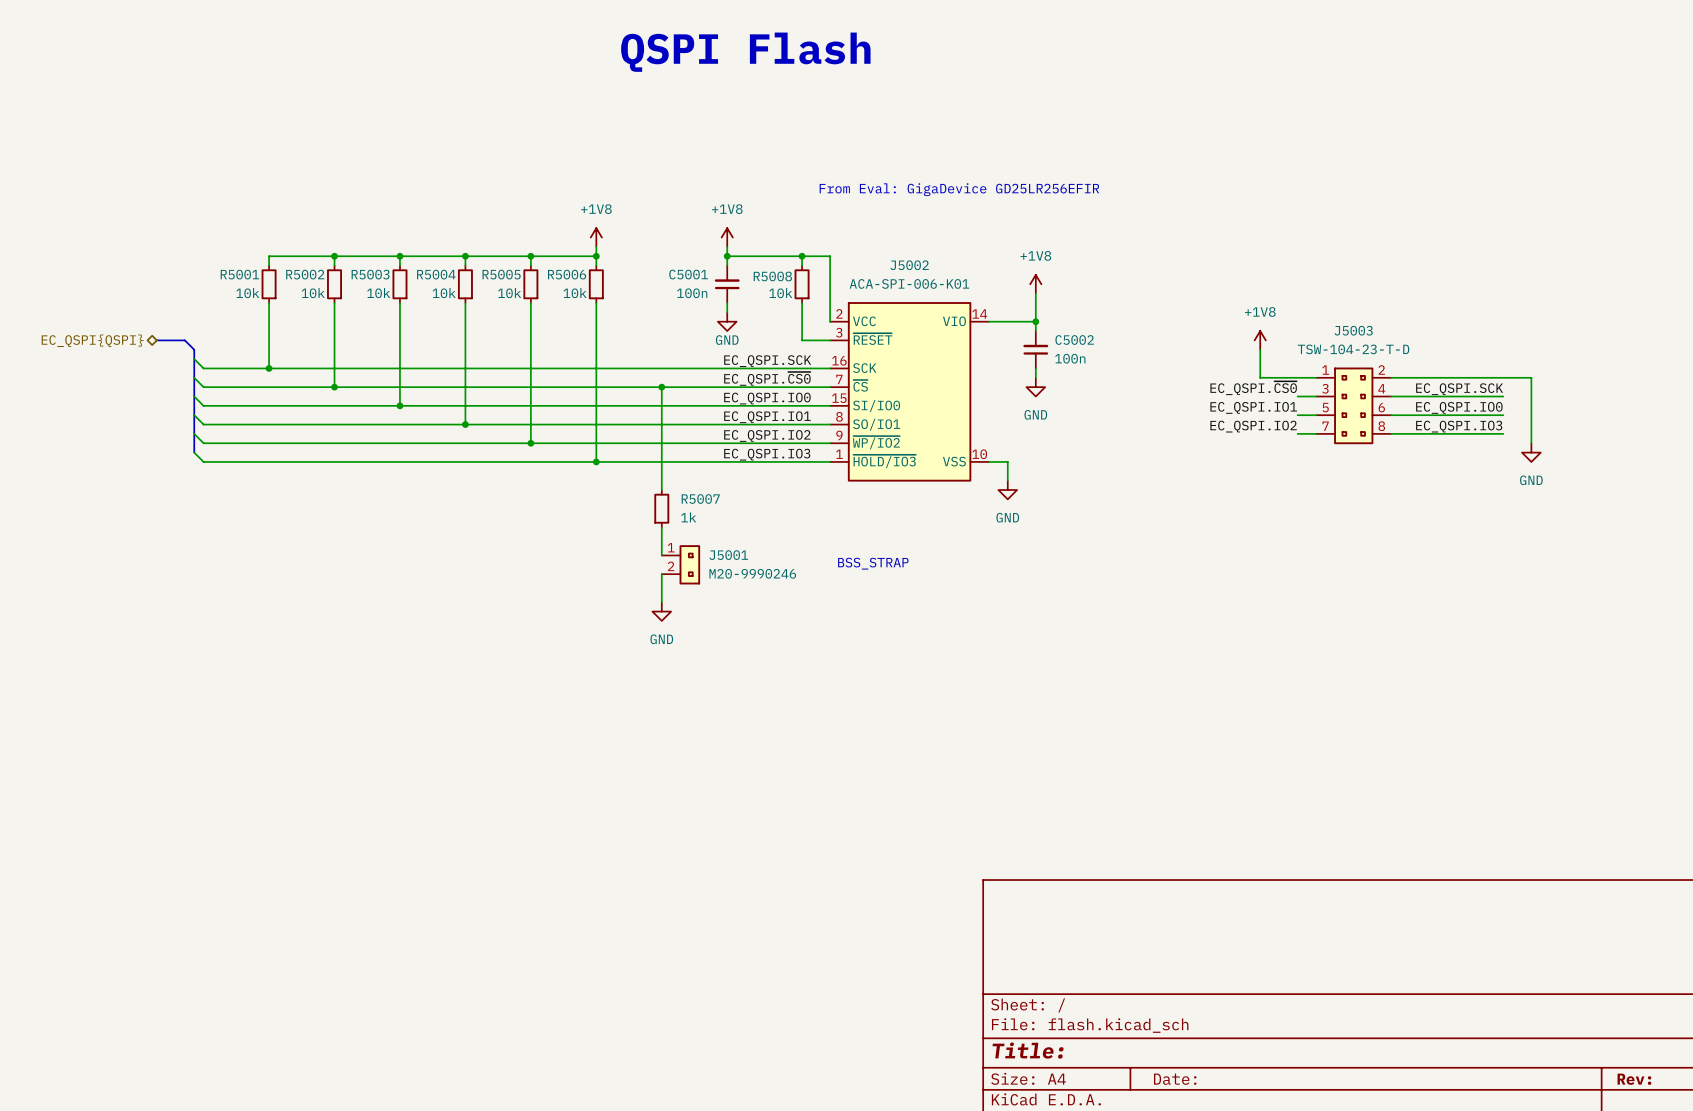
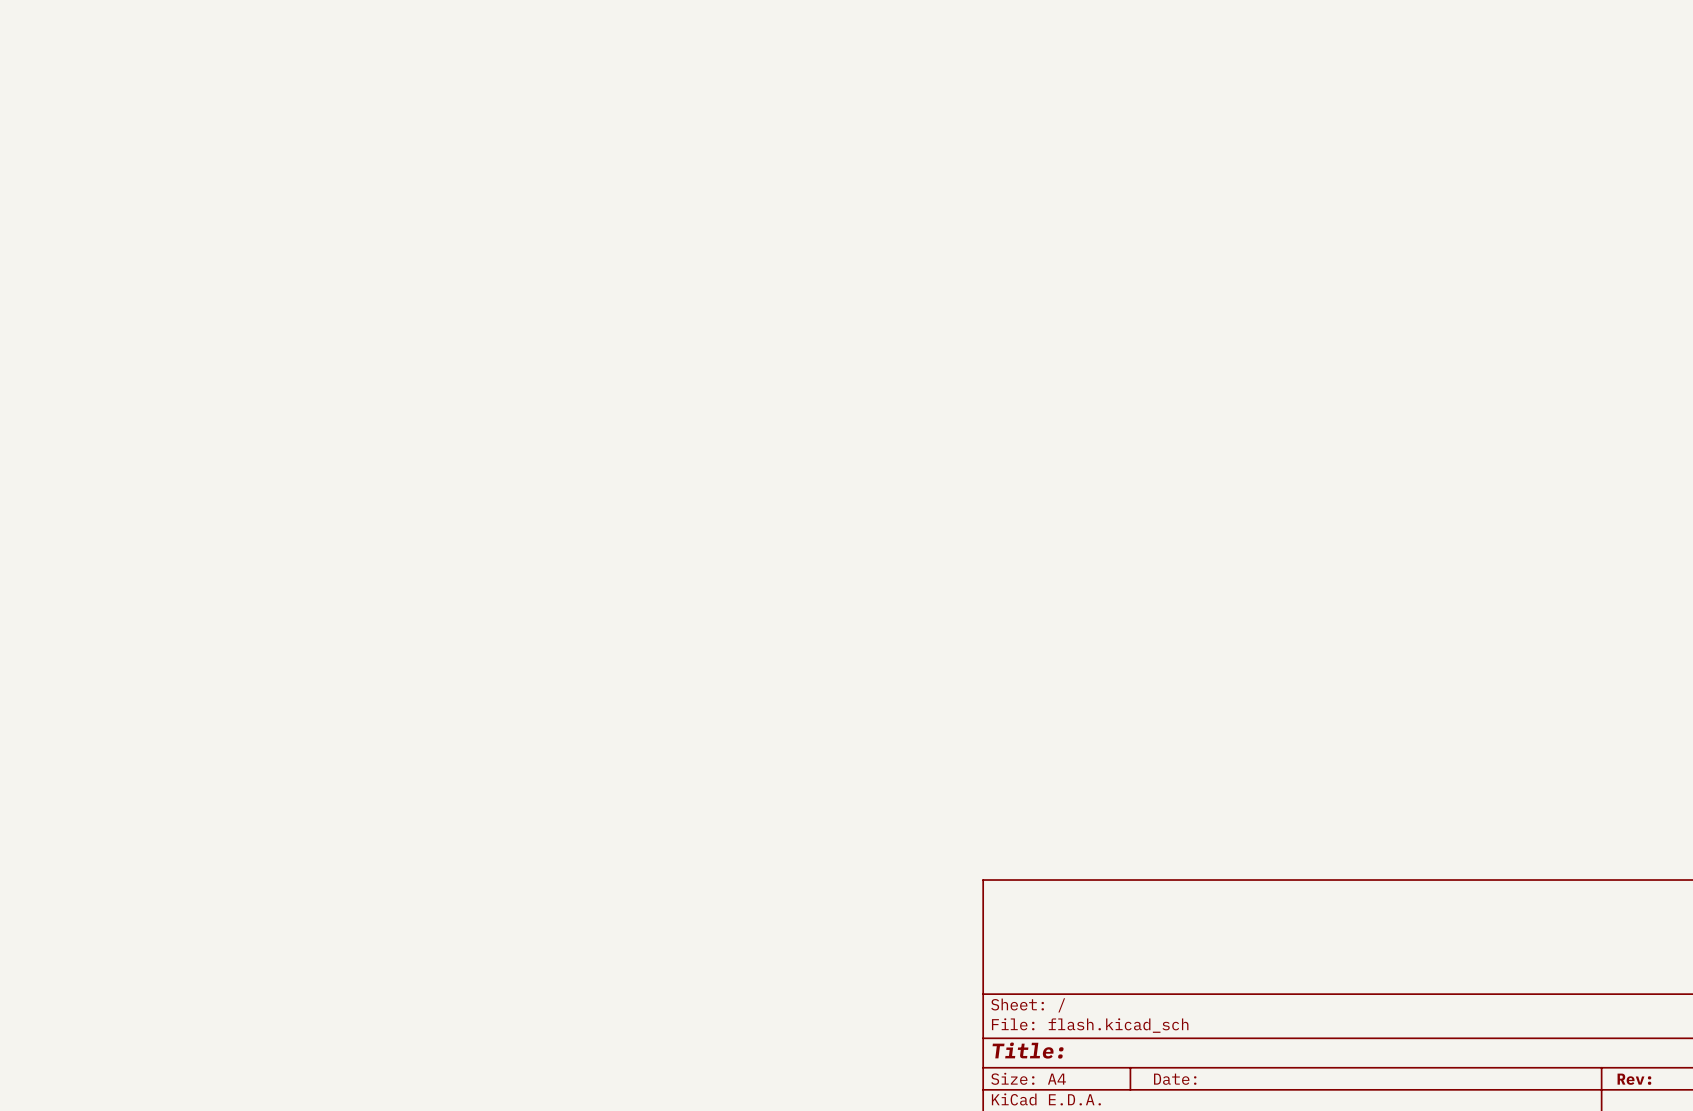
text: QSPI Flash (745, 52) -> none
text: From Eval: GigaDevice GD25LR256EFIR (959, 189) -> none
power symbol: +1V8 (596, 237) -> none
power symbol: +1V8 (727, 237) -> none
wire: (596, 246) (596, 265) -> none
wire: (727, 246) (727, 265) -> none
wire: (334, 256) (334, 265) -> none
junction: (334, 256) -> none
wire: (399, 256) (399, 265) -> none
junction: (399, 256) -> none
wire: (465, 256) (465, 265) -> none
junction: (465, 256) -> none
wire: (530, 256) (530, 265) -> none
junction: (530, 256) -> none
wire: (596, 256) (269, 256) (269, 265) -> none
junction: (596, 256) -> none
wire: (727, 256) (830, 256) (830, 321) -> none
junction: (727, 256) -> none
wire: (802, 256) (802, 265) -> none
junction: (802, 256) -> none
R5001: (269, 284) -> none
R5002: (334, 284) -> none
R5003: (399, 284) -> none
R5004: (465, 284) -> none
R5005: (530, 284) -> none
R5006: (596, 284) -> none
C5001: (727, 284) -> none
R5008: (802, 284) -> none
power symbol: +1V8 (1035, 284) -> none
wire: (1035, 293) (1035, 331) -> none
wire: (269, 303) (269, 368) -> none
wire: (334, 303) (334, 387) -> none
wire: (399, 303) (399, 405) -> none
wire: (465, 303) (465, 424) -> none
wire: (530, 303) (530, 443) -> none
wire: (596, 303) (596, 461) -> none
wire: (727, 303) (727, 312) -> none
wire: (802, 303) (802, 340) (830, 340) -> none
power symbol: GND (727, 321) -> none
wire: (989, 321) (1035, 321) -> none
junction: (1035, 321) -> none
hierarchical label: EC_QSPI{QSPI} (92, 340) -> none
bus: (156, 340) (184, 340) (194, 349) (194, 452) -> none
power symbol: +1V8 (1260, 340) -> none
C5002: (1035, 349) -> none
wire: (1260, 349) (1260, 377) (1316, 377) -> none
wire: (194, 359) (203, 368) (830, 368) -> none
label: EC_QSPI.SCK (767, 361) -> none
junction: (269, 368) -> none
wire: (1035, 368) (1035, 377) -> none
wire: (194, 377) (203, 387) (830, 387) -> none
wire: (1391, 377) (1531, 377) (1531, 443) -> none
label: EC_QSPI.~{CS0} (767, 378) -> none
junction: (334, 387) -> none
wire: (661, 387) (661, 490) -> none
junction: (661, 387) -> none
power symbol: GND (1035, 387) -> none
label: EC_QSPI.~{CS0} (1253, 388) -> none
label: EC_QSPI.SCK (1459, 389) -> none
J5002: (909, 391) -> none
wire: (194, 396) (203, 405) (830, 405) -> none
wire: (1297, 396) (1316, 396) -> none
wire: (1391, 396) (1503, 396) -> none
label: EC_QSPI.IO0 (767, 398) -> none
junction: (399, 405) -> none
J5003: (1353, 405) -> none
label: EC_QSPI.IO1 (1253, 407) -> none
label: EC_QSPI.IO0 (1459, 407) -> none
wire: (194, 415) (203, 424) (830, 424) -> none
wire: (1297, 415) (1316, 415) -> none
wire: (1391, 415) (1503, 415) -> none
label: EC_QSPI.IO1 (767, 417) -> none
junction: (465, 424) -> none
label: EC_QSPI.IO2 (1253, 426) -> none
label: EC_QSPI.IO3 (1459, 426) -> none
wire: (194, 433) (203, 443) (830, 443) -> none
wire: (1297, 433) (1316, 433) -> none
wire: (1391, 433) (1503, 433) -> none
label: EC_QSPI.IO2 (767, 435) -> none
junction: (530, 443) -> none
wire: (194, 452) (203, 461) (830, 461) -> none
power symbol: GND (1531, 452) -> none
label: EC_QSPI.IO3 (767, 454) -> none
junction: (596, 461) -> none
wire: (989, 461) (1007, 461) (1007, 480) -> none
power symbol: GND (1007, 490) -> none
R5007: (661, 508) -> none
wire: (661, 527) (661, 555) -> none
text: BSS_STRAP (873, 563) -> none
J5001: (680, 564) -> none
wire: (661, 574) (661, 602) -> none
power symbol: GND (661, 611) -> none

